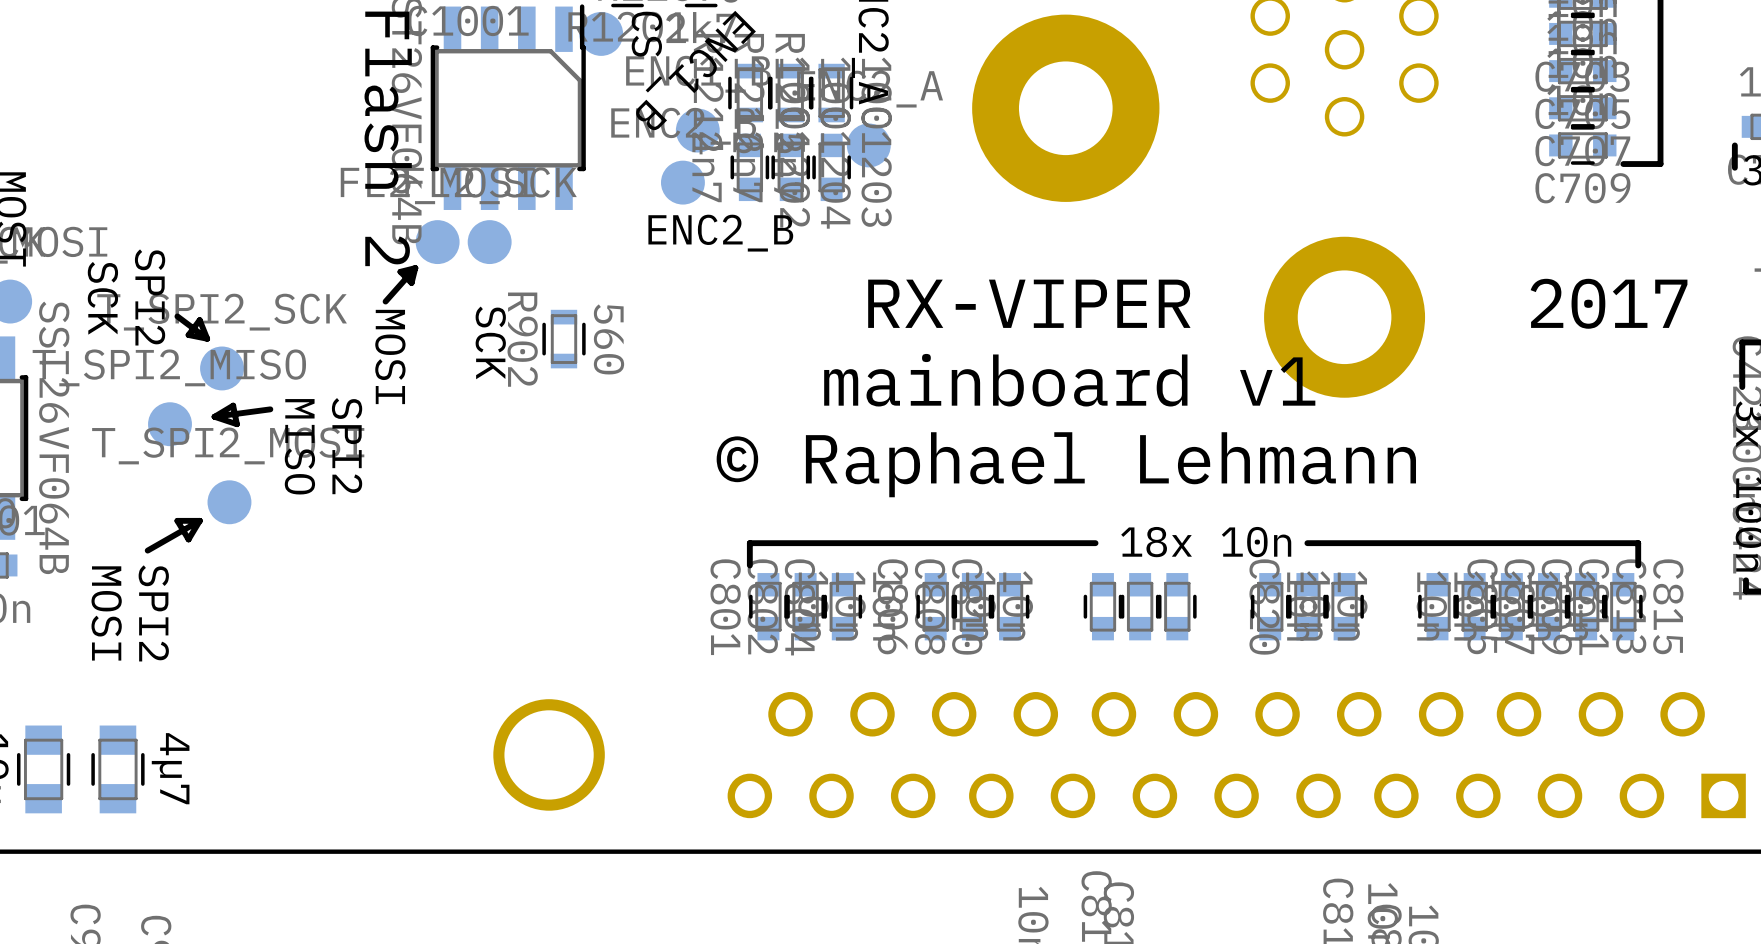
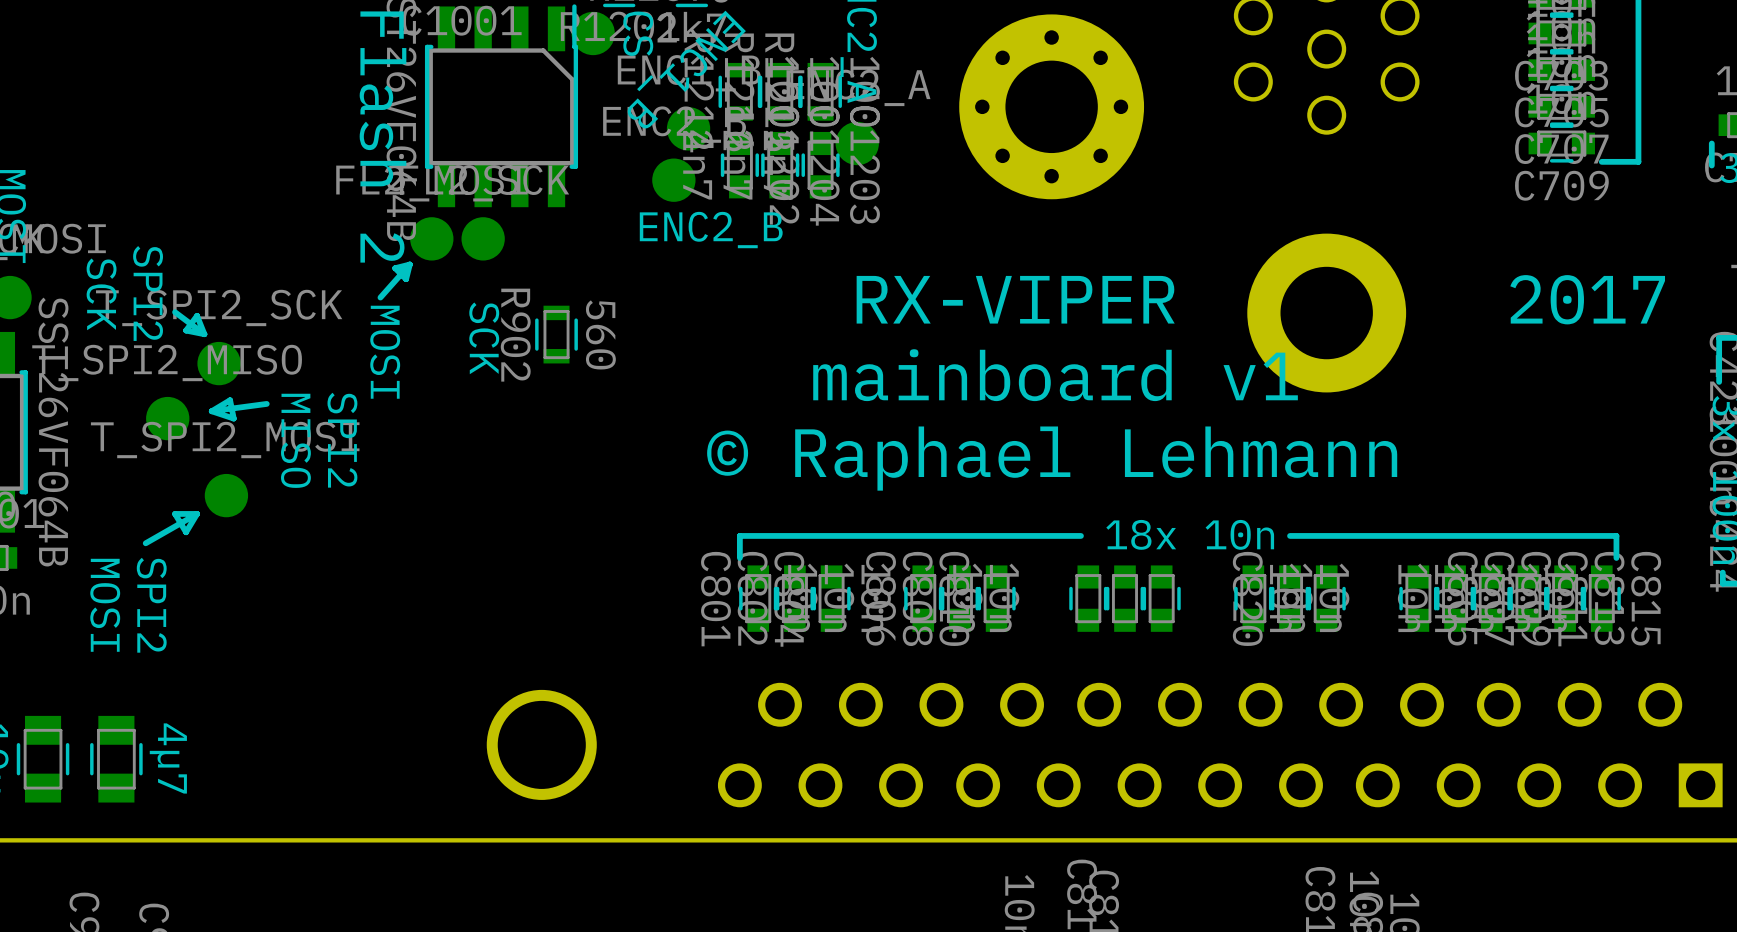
part footprint: [972, 14, 1160, 202] -> [959, 14, 1145, 200]

